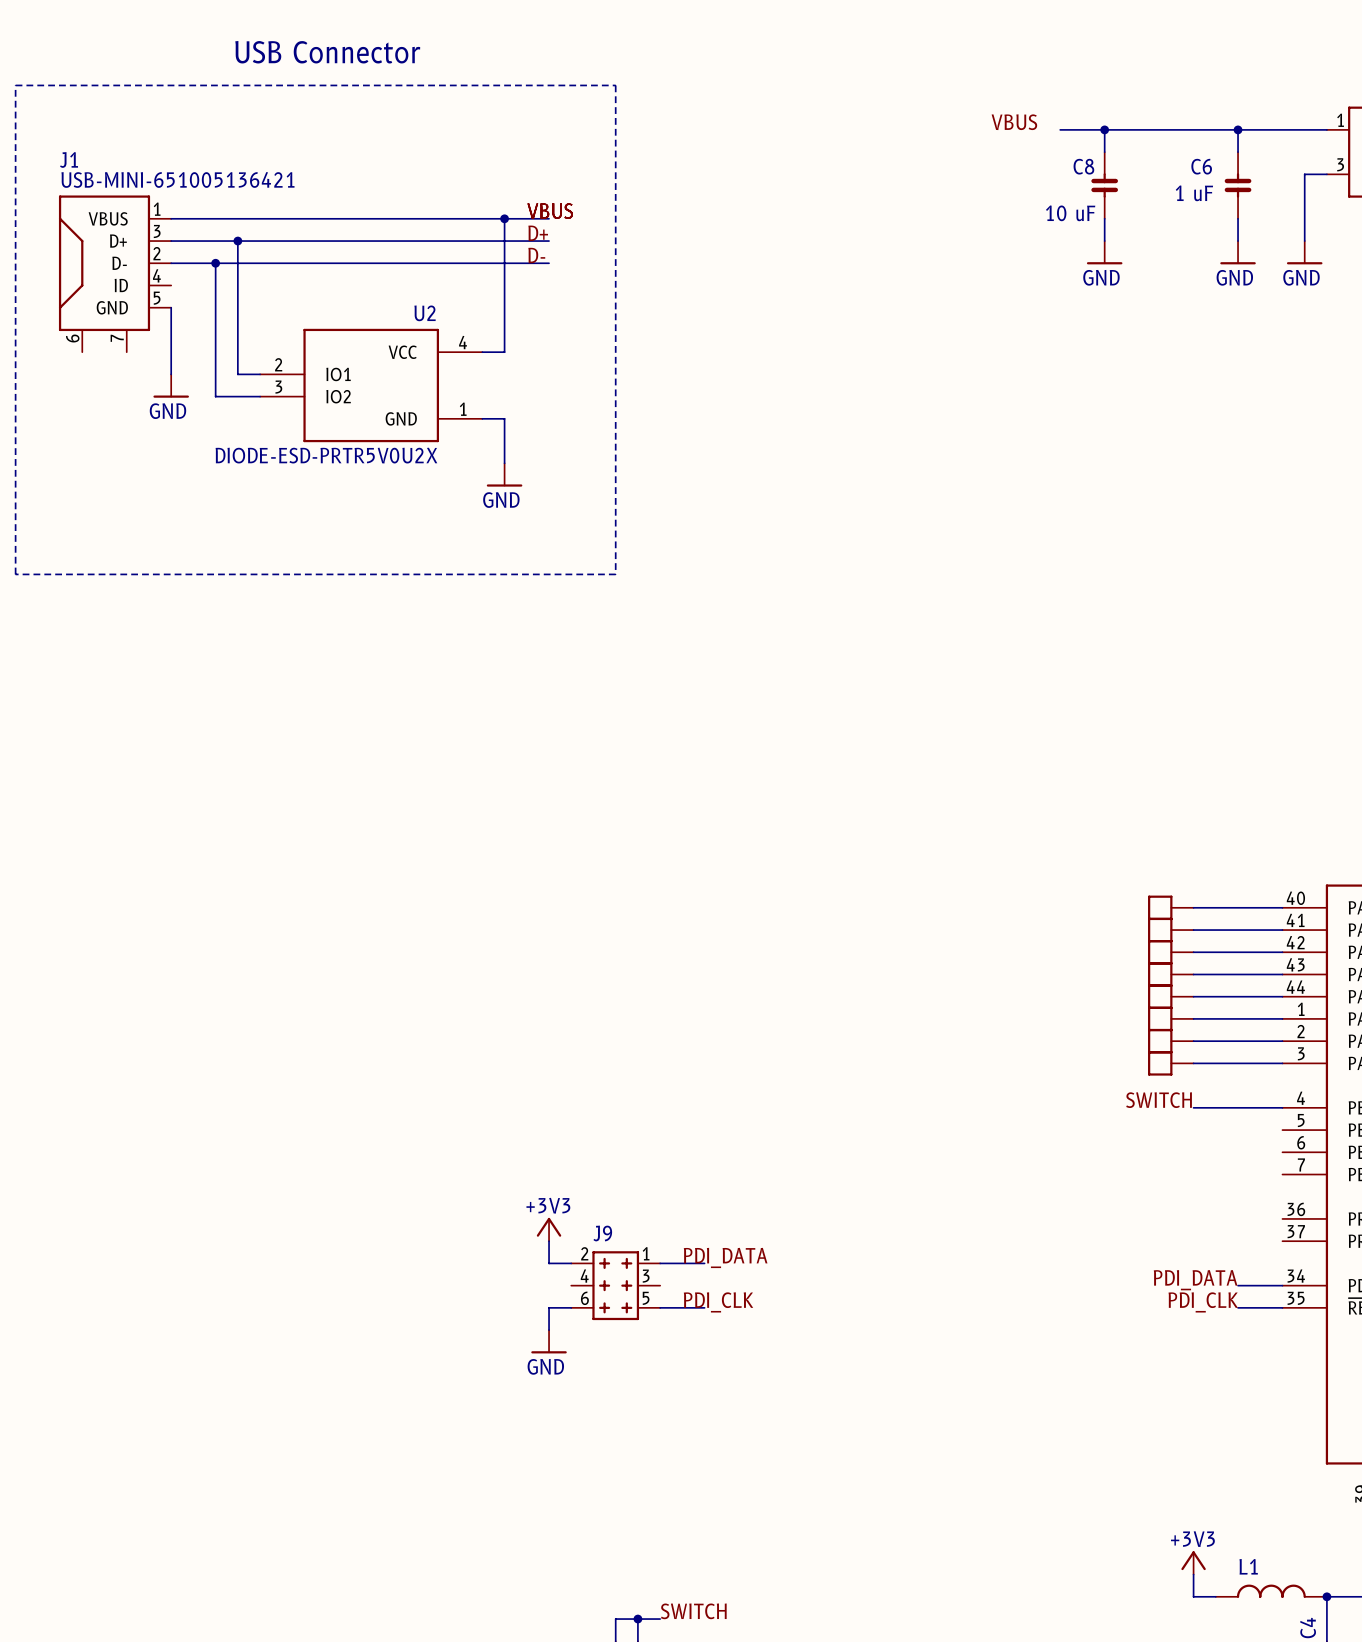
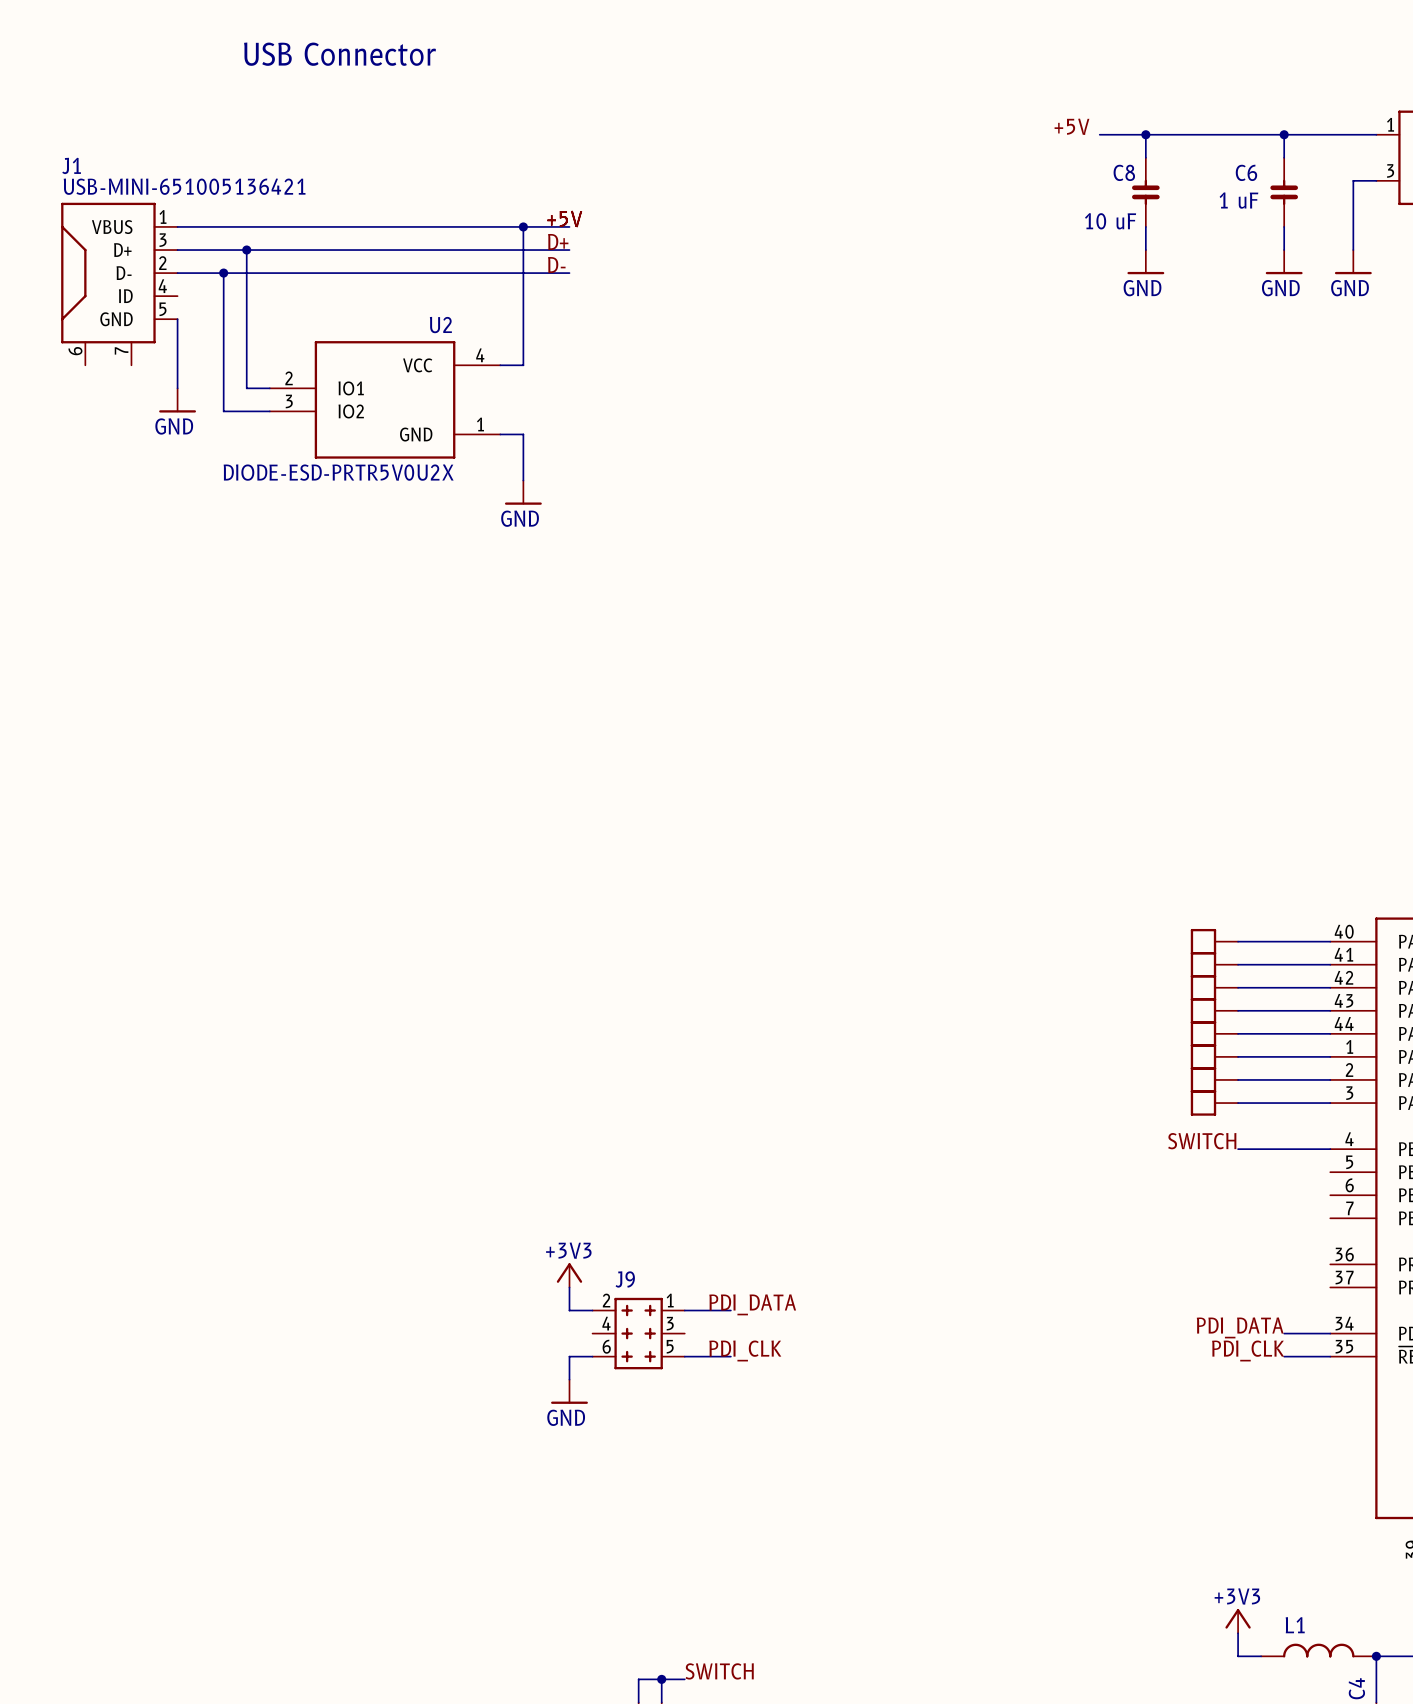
wire: (15, 85) (615, 85) (615, 574) (15, 574) (15, 85) -> none
label: VBUS (1014, 122) -> none
label: none -> +5V (1071, 126)
label: VBUS (550, 211) -> +5V (564, 219)

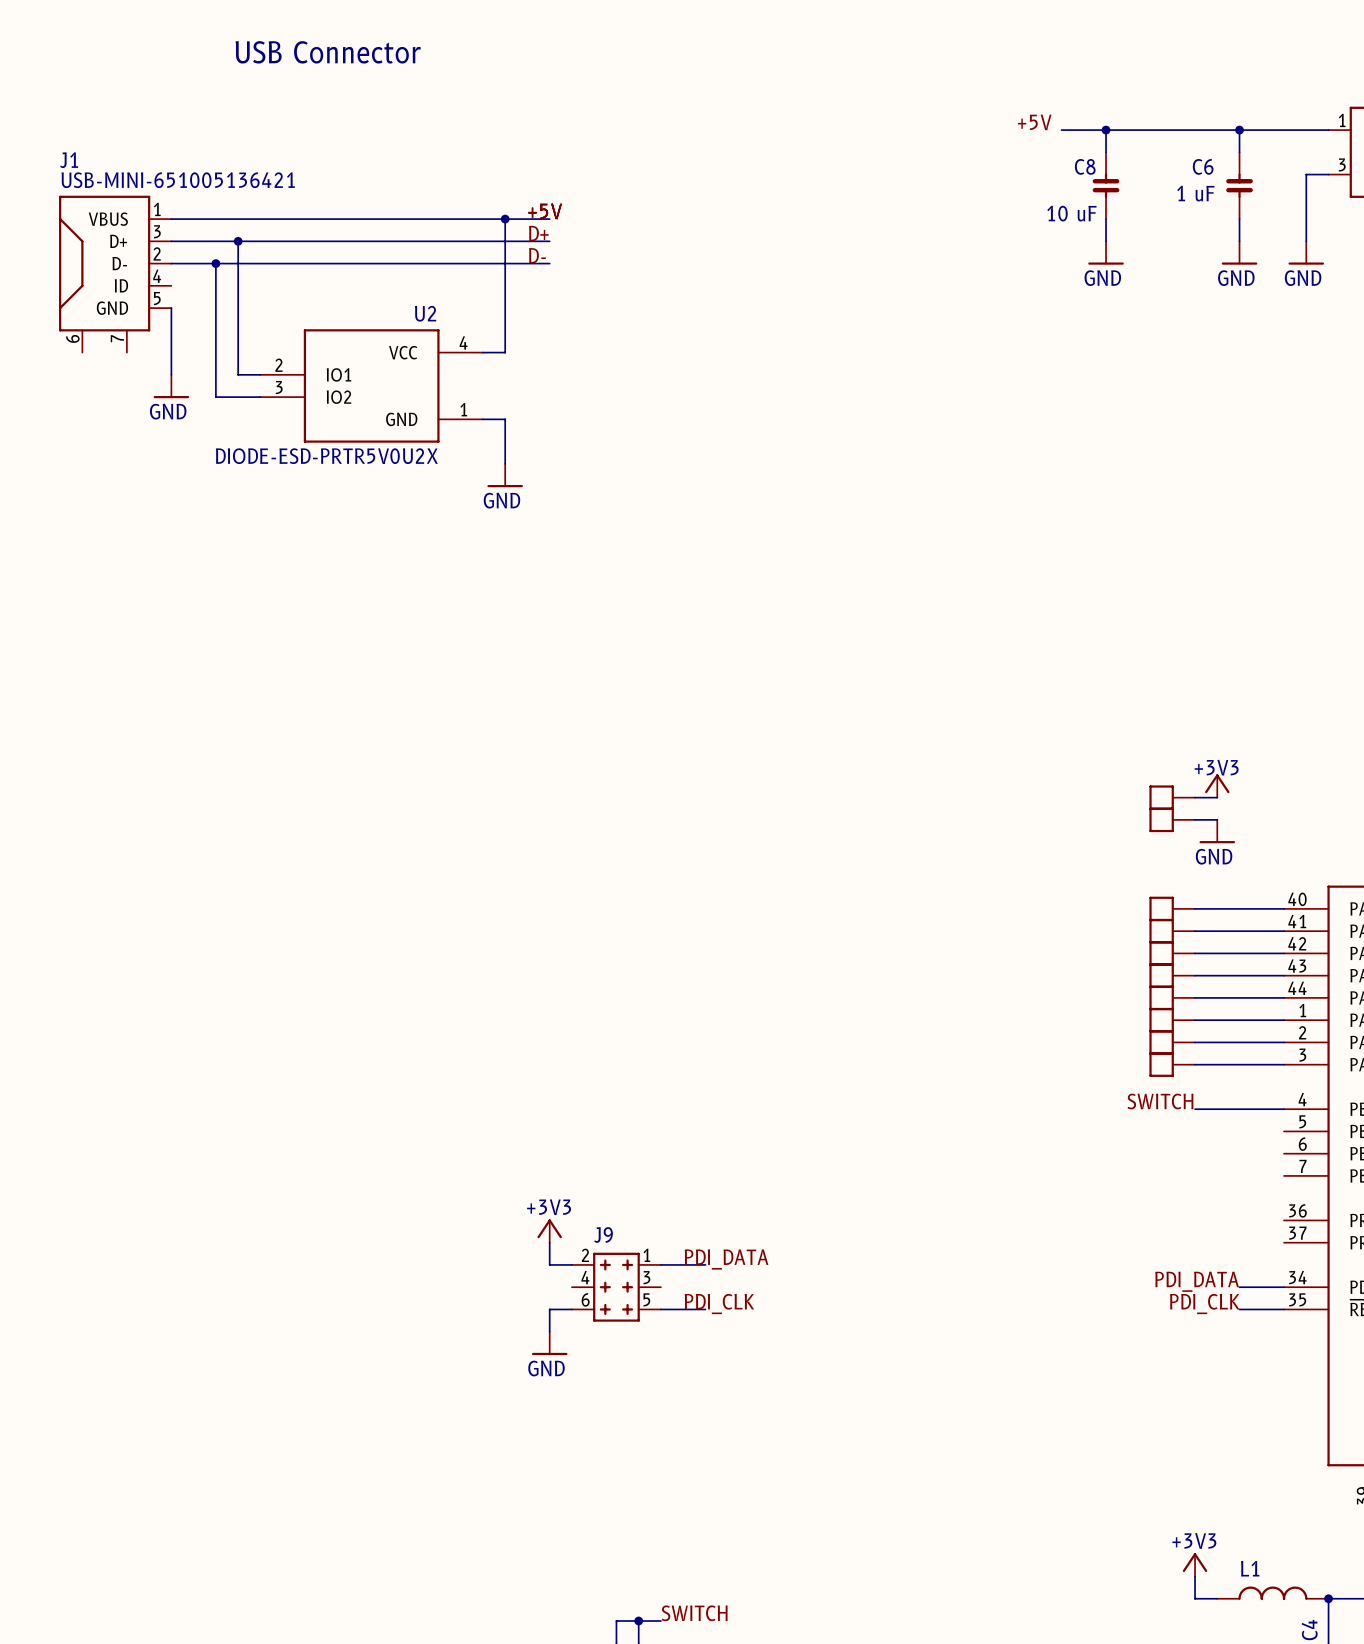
power symbol: none -> +3V3 (1217, 785)
part: none -> (1172, 797)
wire: none -> (1195, 797) (1217, 797)
part: none -> (1172, 819)
wire: none -> (1195, 819) (1217, 819)
power symbol: none -> GND (1217, 831)

